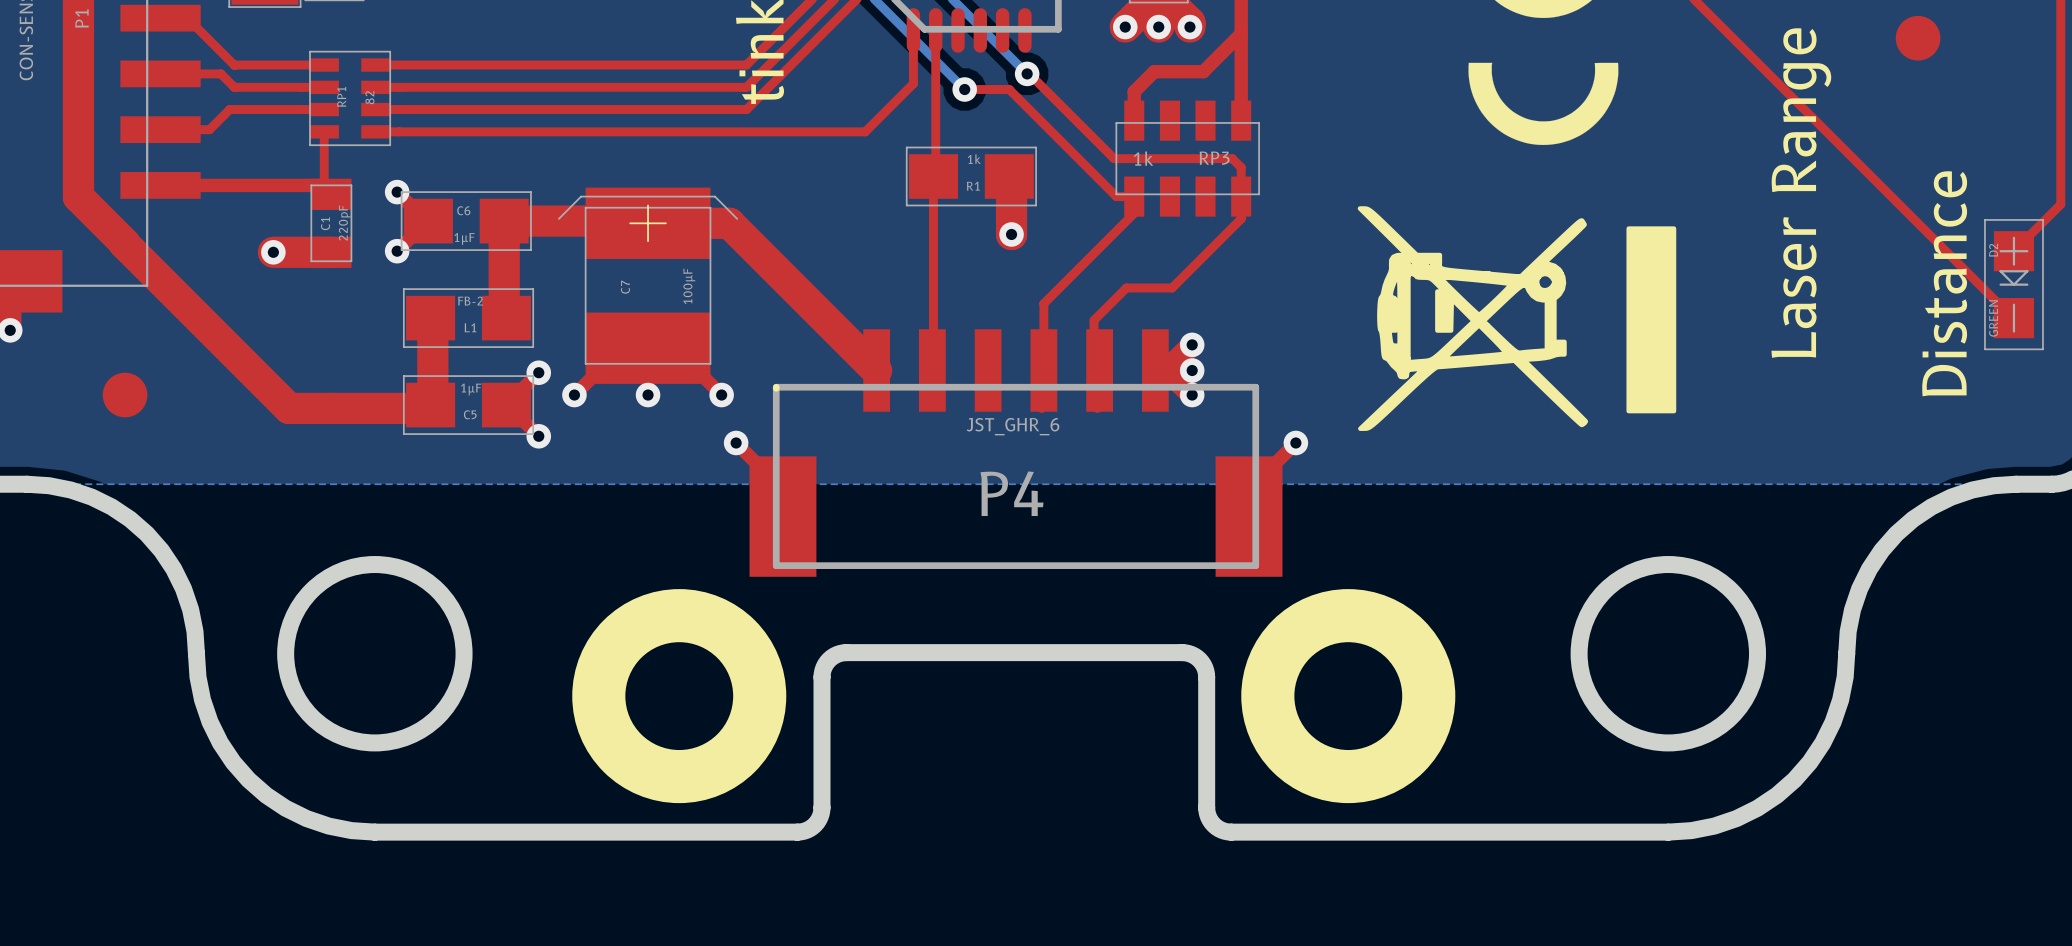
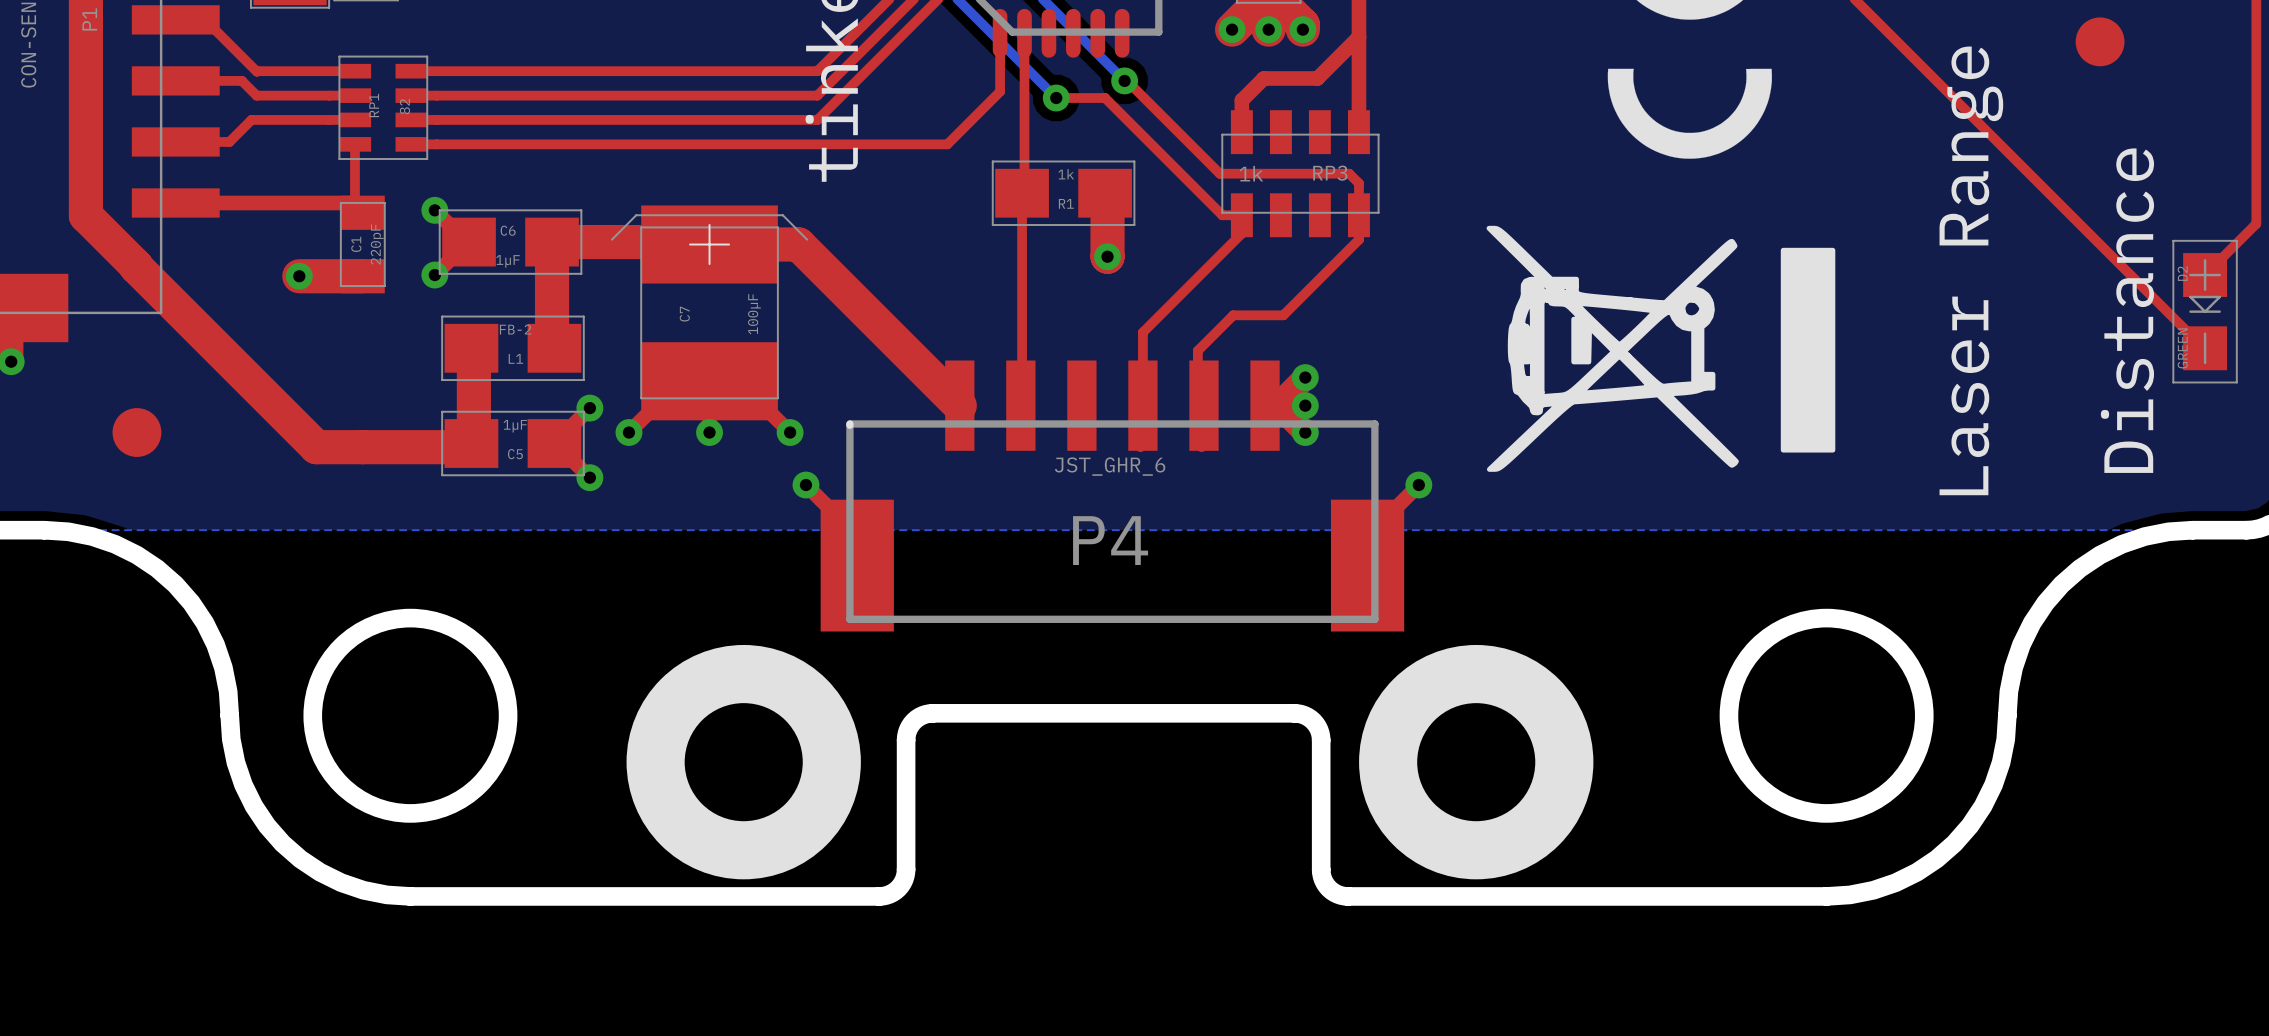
board edge: (26, 484) (70, 490) (91, 497) (130, 519) (146, 533) (173, 568) (183, 588) (195, 631) (197, 677) (202, 699) (210, 722) (220, 742) (233, 762) (248, 779) (266, 795) (285, 808) (306, 818) (328, 826) (351, 830) (797, 832) (806, 830) (816, 822) (821, 810) (822, 670) (831, 657) (843, 652) (1185, 652) (1199, 659) (1204, 667) (1206, 677) -> (29, 530) (68, 531) (92, 536) (115, 544) (136, 555) (157, 568) (175, 584) (191, 602) (204, 622) (215, 644) (223, 667) (228, 691) (231, 739) (235, 762) (243, 784) (253, 806) (267, 825) (282, 843) (300, 859) (320, 872) (341, 882) (363, 890) (386, 894) (410, 896) (886, 895) (898, 888) (905, 873) (907, 733) (916, 718) (929, 713) (1297, 713) (1307, 716) (1315, 723) (1320, 733) (1321, 741)
board edge: (2016, 484) (1972, 490) (1951, 497) (1913, 519) (1881, 550) (1869, 568) (1852, 609) (1848, 631) (1845, 677) (1840, 699) (1833, 722) (1822, 742) (1809, 762) (1794, 779) (1776, 795) (1757, 808) (1736, 818) (1714, 826) (1691, 830) (1668, 832) (1231, 832) (1218, 828) (1209, 819) (1206, 810) (1206, 794) -> (2207, 530) (2168, 531) (2144, 536) (2121, 544) (2100, 555) (2079, 568) (2061, 584) (2045, 602) (2032, 622) (2021, 644) (2013, 667) (2008, 691) (2005, 739) (2001, 762) (1993, 784) (1983, 806) (1969, 825) (1954, 843) (1936, 859) (1916, 872) (1895, 882) (1873, 890) (1850, 894) (1826, 896) (1348, 896) (1337, 894) (1329, 888) (1323, 879) (1321, 869)

